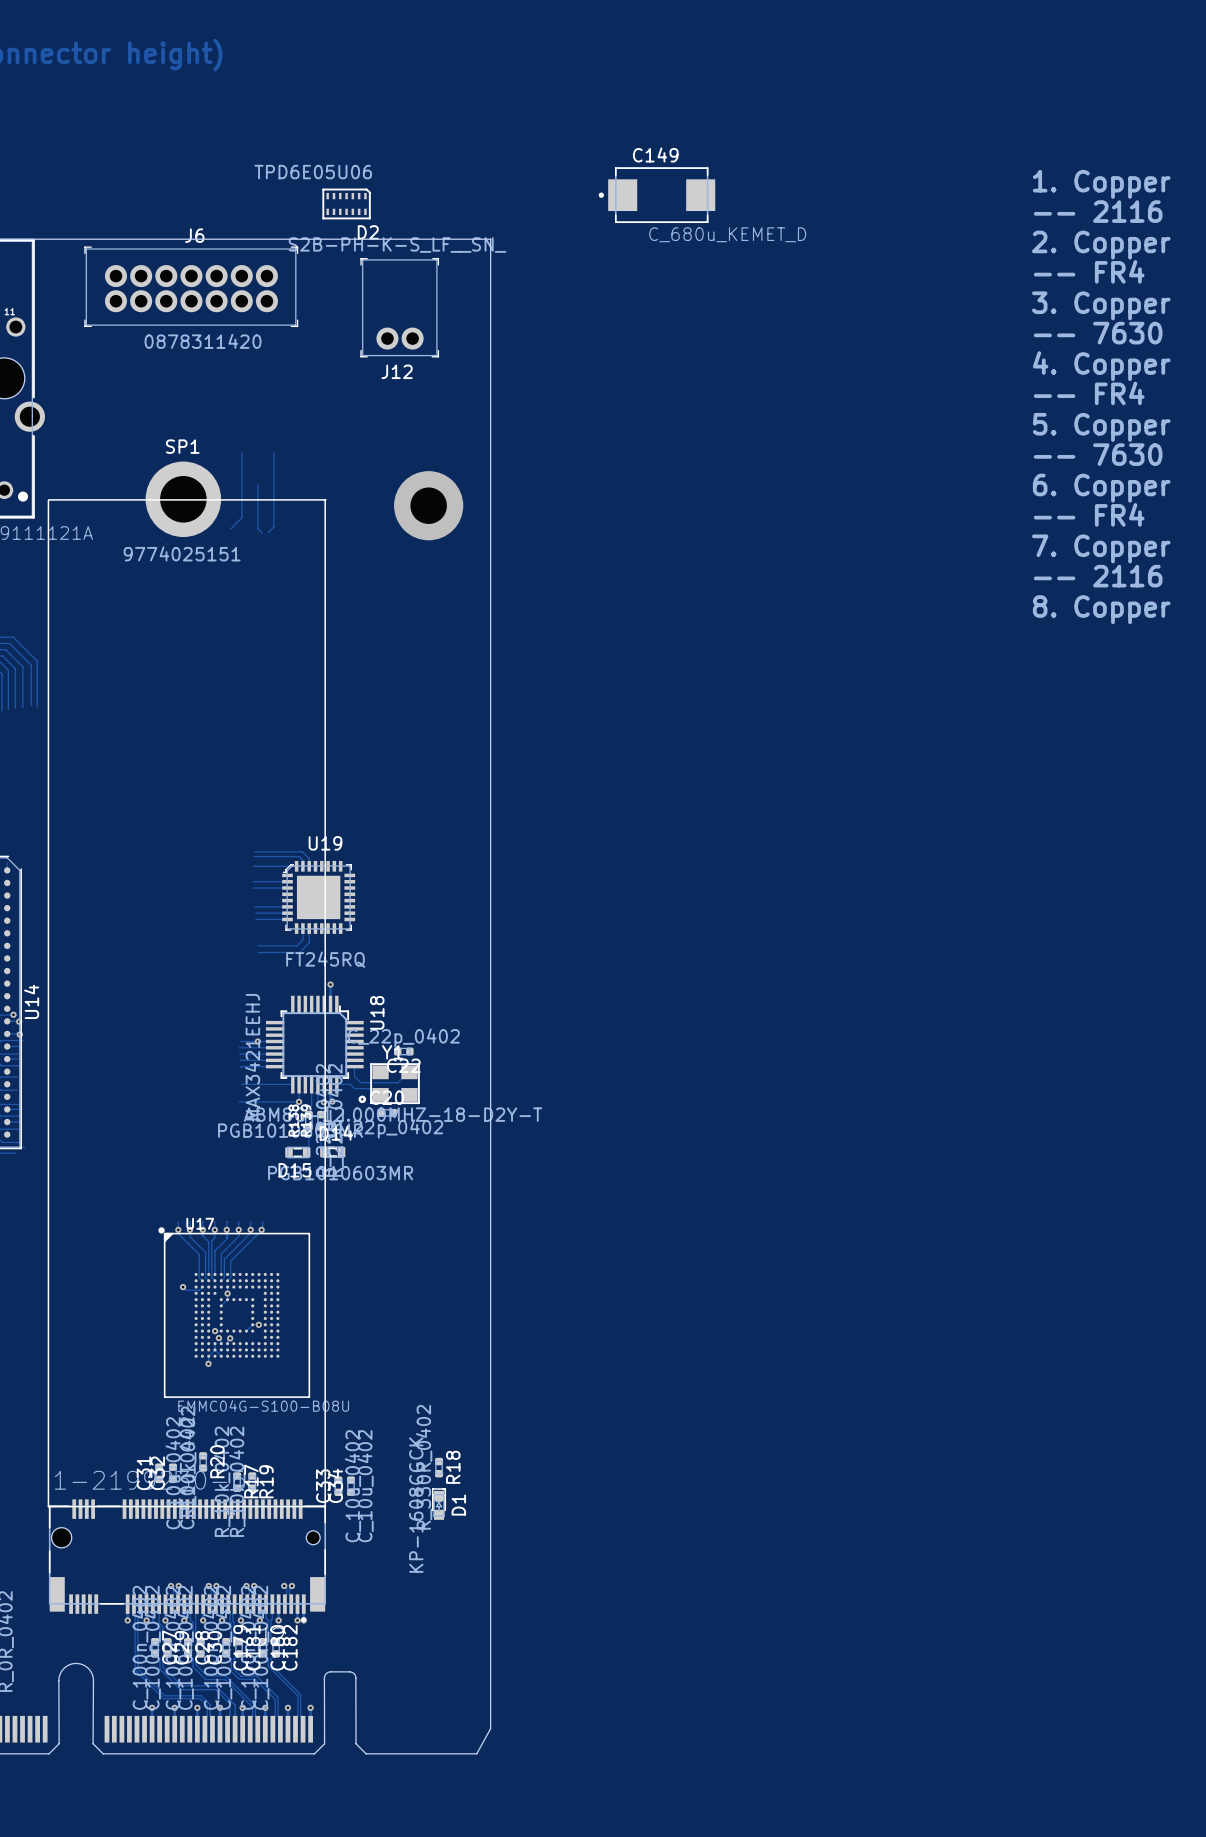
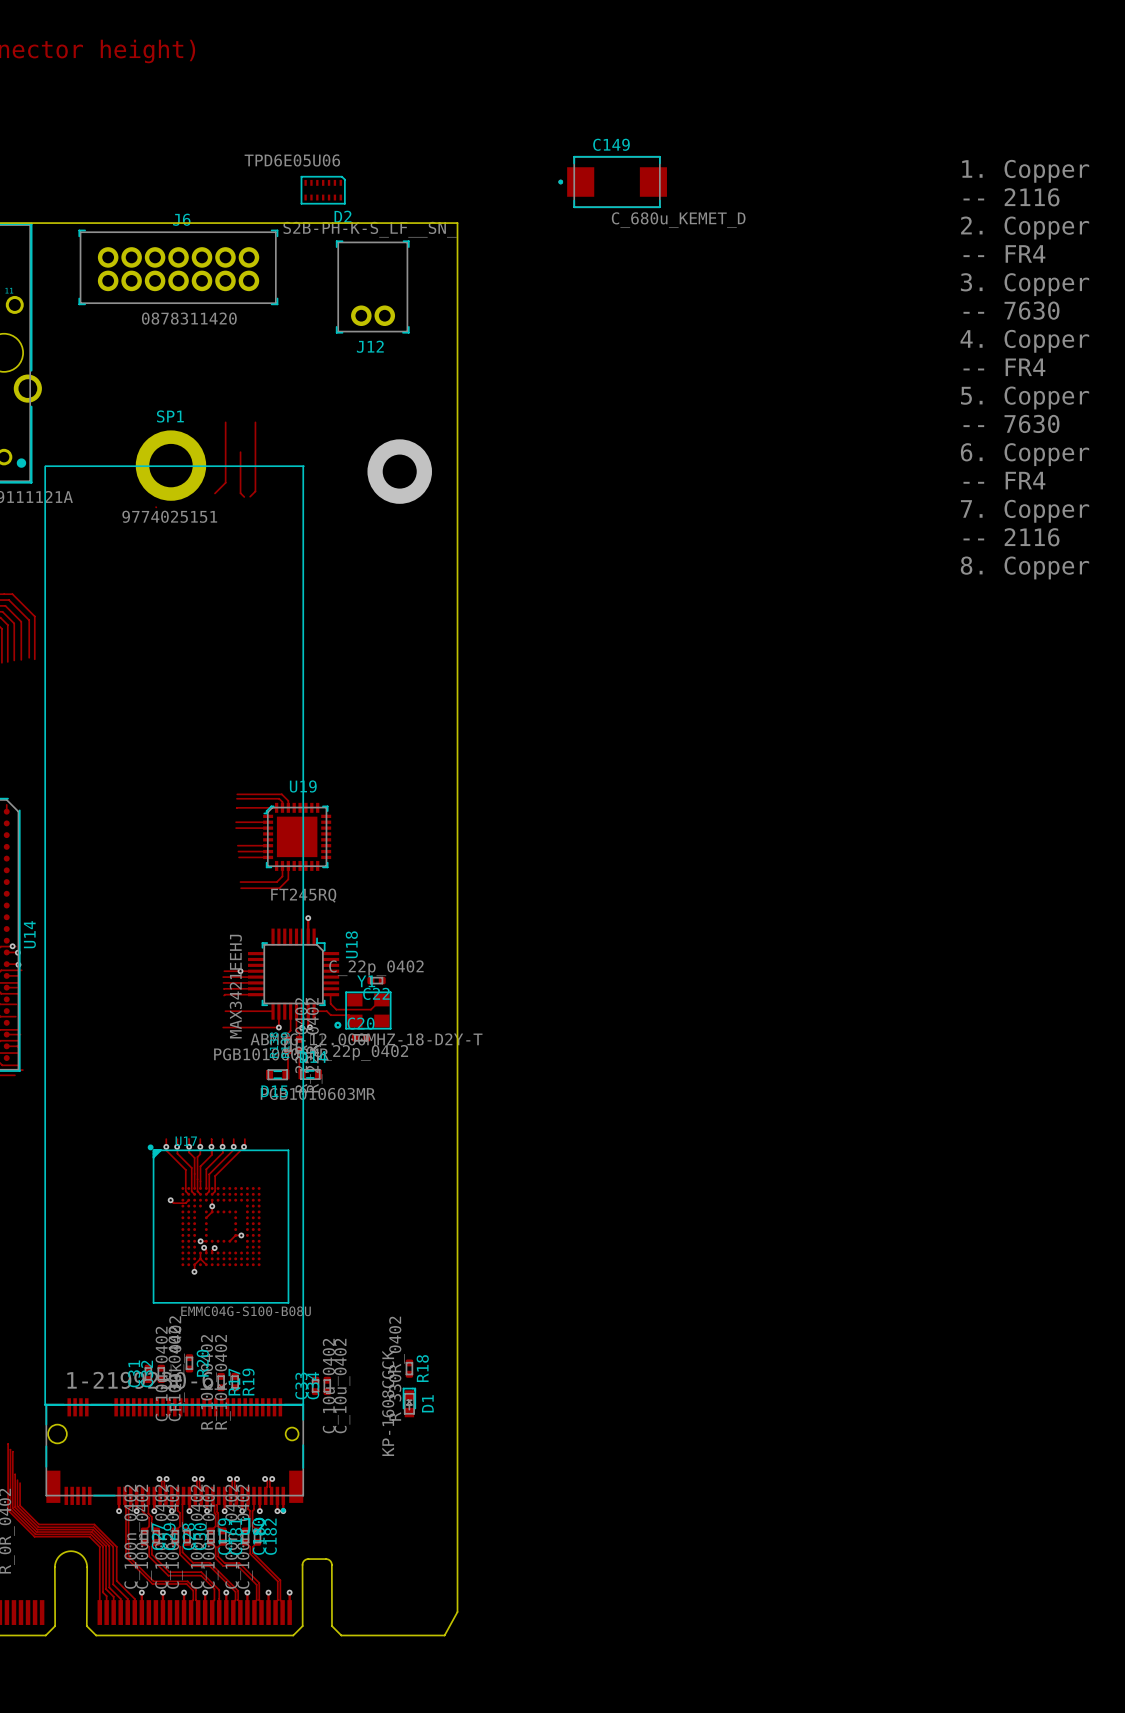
track: none -> (8, 1444) (8, 1510) (34, 1536) (89, 1536) (99, 1546) (99, 1612)
track: none -> (10, 1449) (10, 1509) (35, 1534) (90, 1534) (103, 1546) (103, 1592) (106, 1596) (106, 1612)
track: none -> (12, 1451) (12, 1508) (36, 1532) (91, 1532) (106, 1546) (106, 1589) (113, 1596) (113, 1612)
track: none -> (15, 1474) (15, 1507) (37, 1529) (92, 1529) (109, 1546) (109, 1587) (120, 1598) (120, 1612)
track: none -> (17, 1480) (17, 1506) (38, 1527) (93, 1527) (113, 1546) (113, 1584) (127, 1598) (127, 1612)
track: none -> (20, 1483) (20, 1505) (38, 1524) (94, 1524) (116, 1546) (116, 1580) (134, 1598) (134, 1612)

